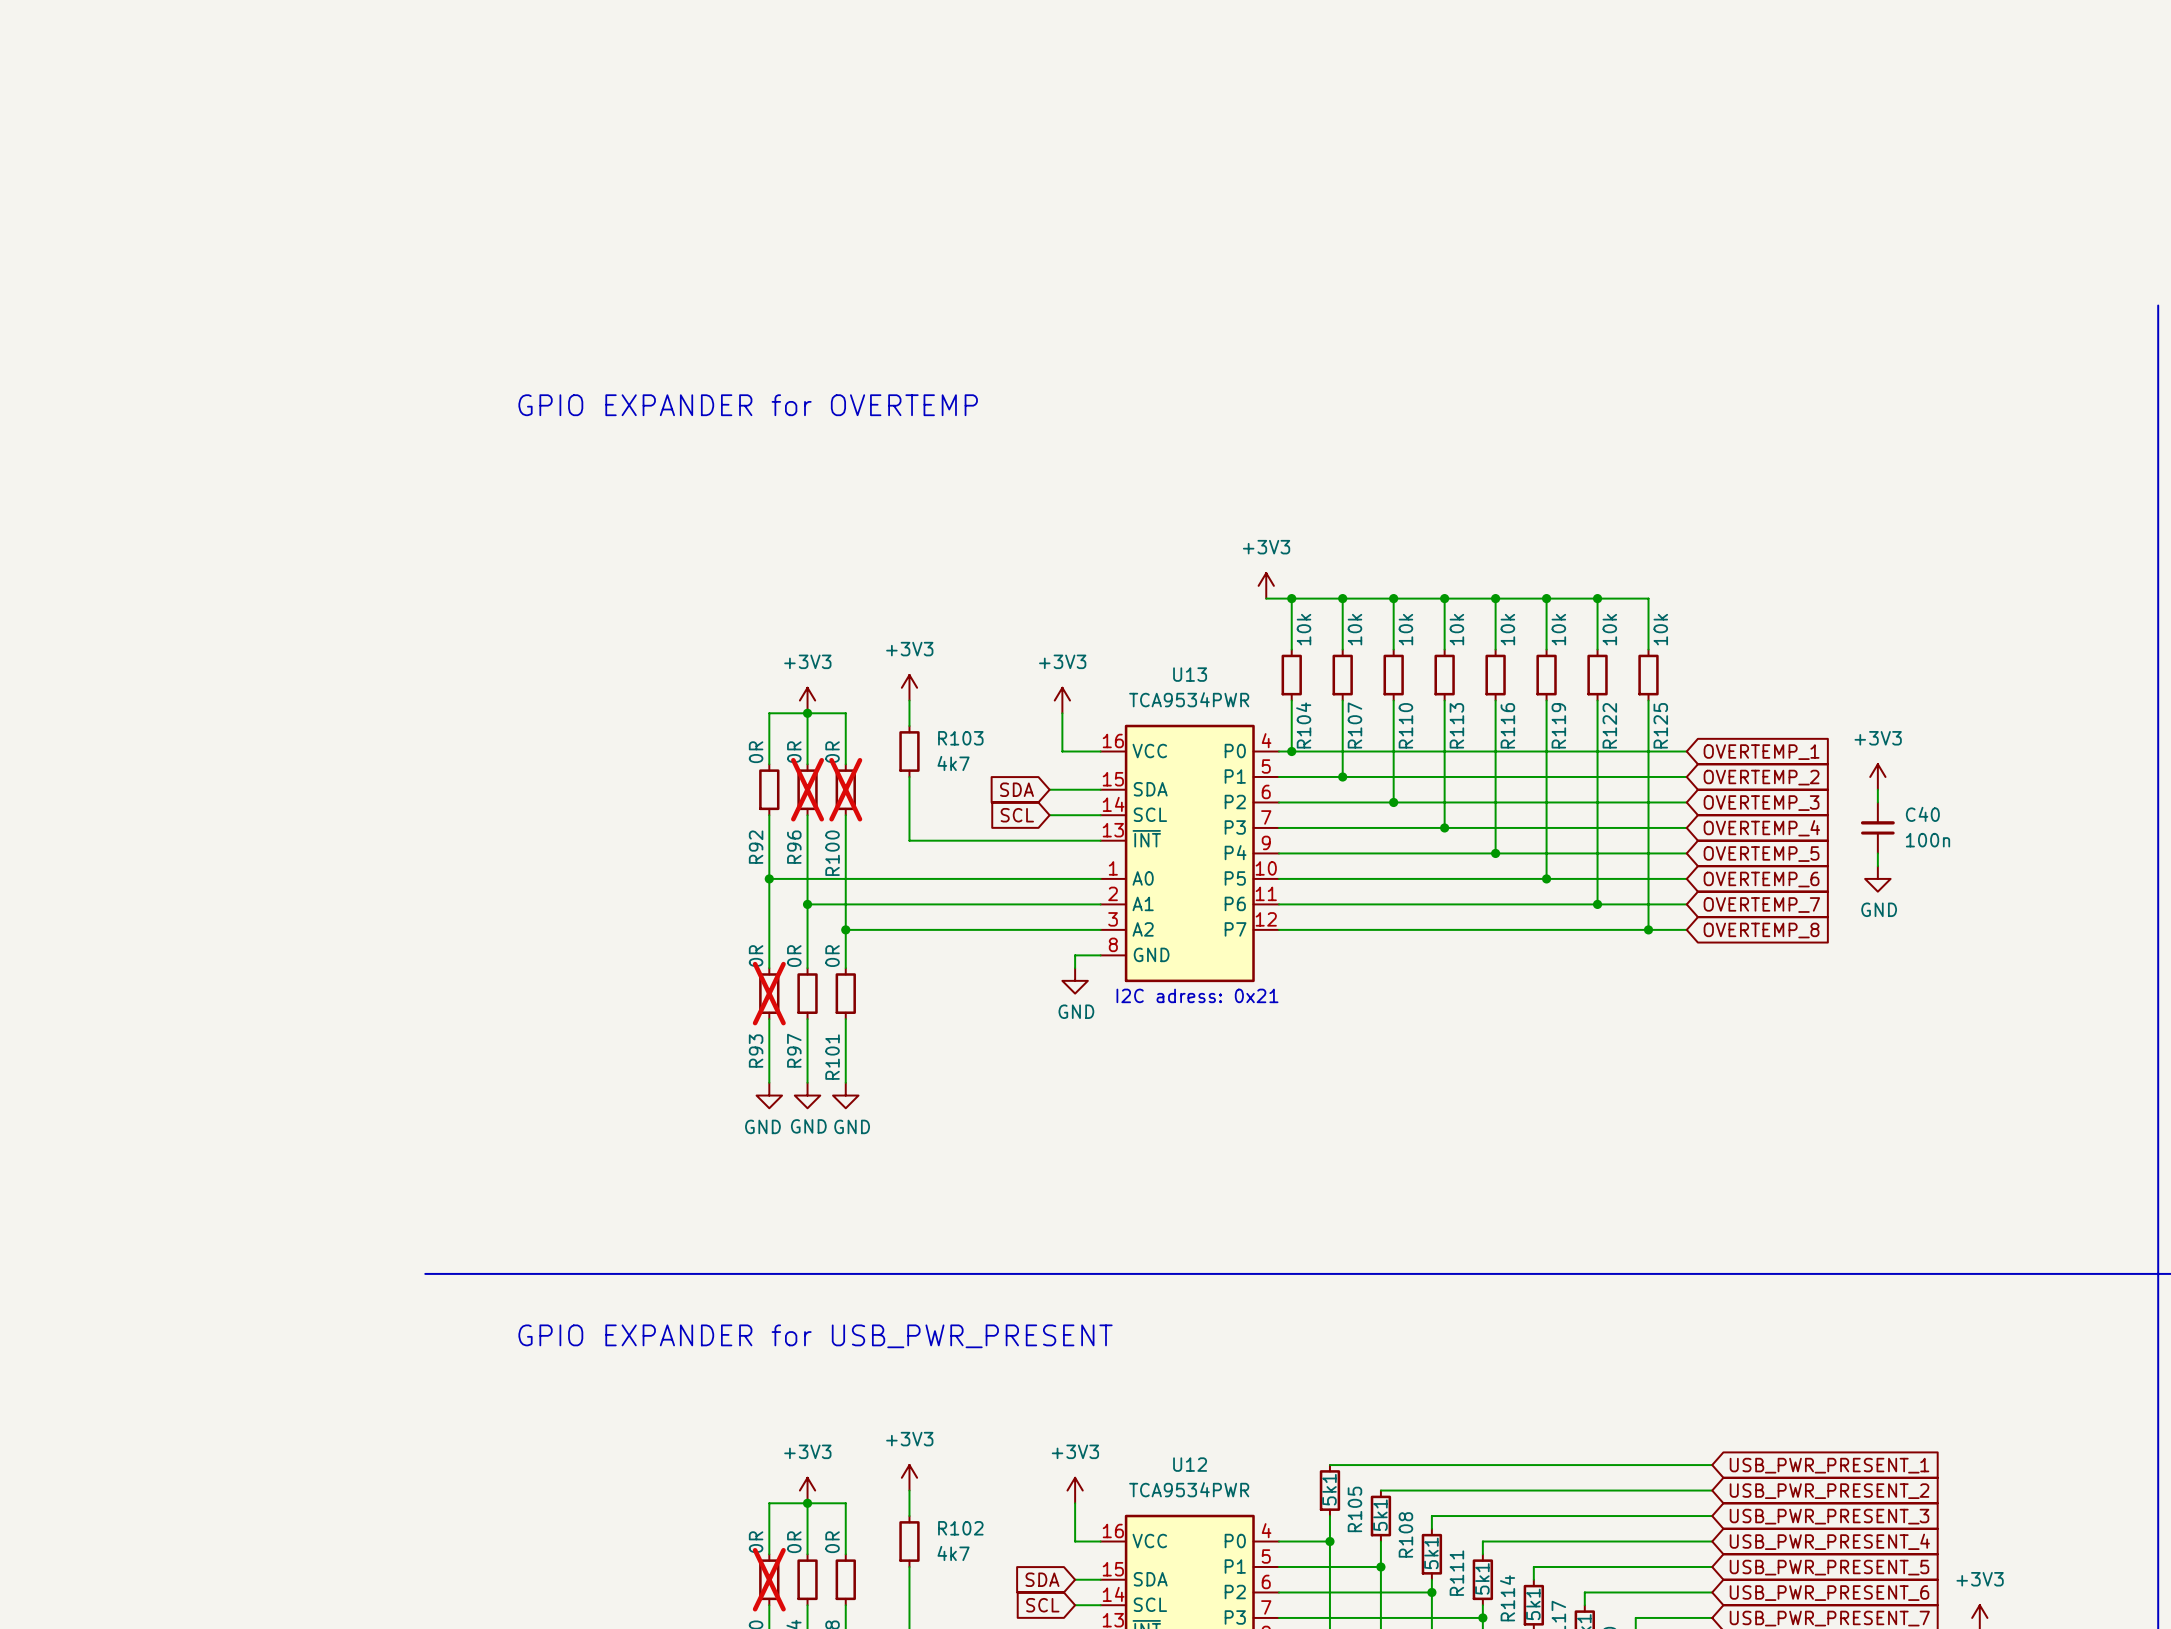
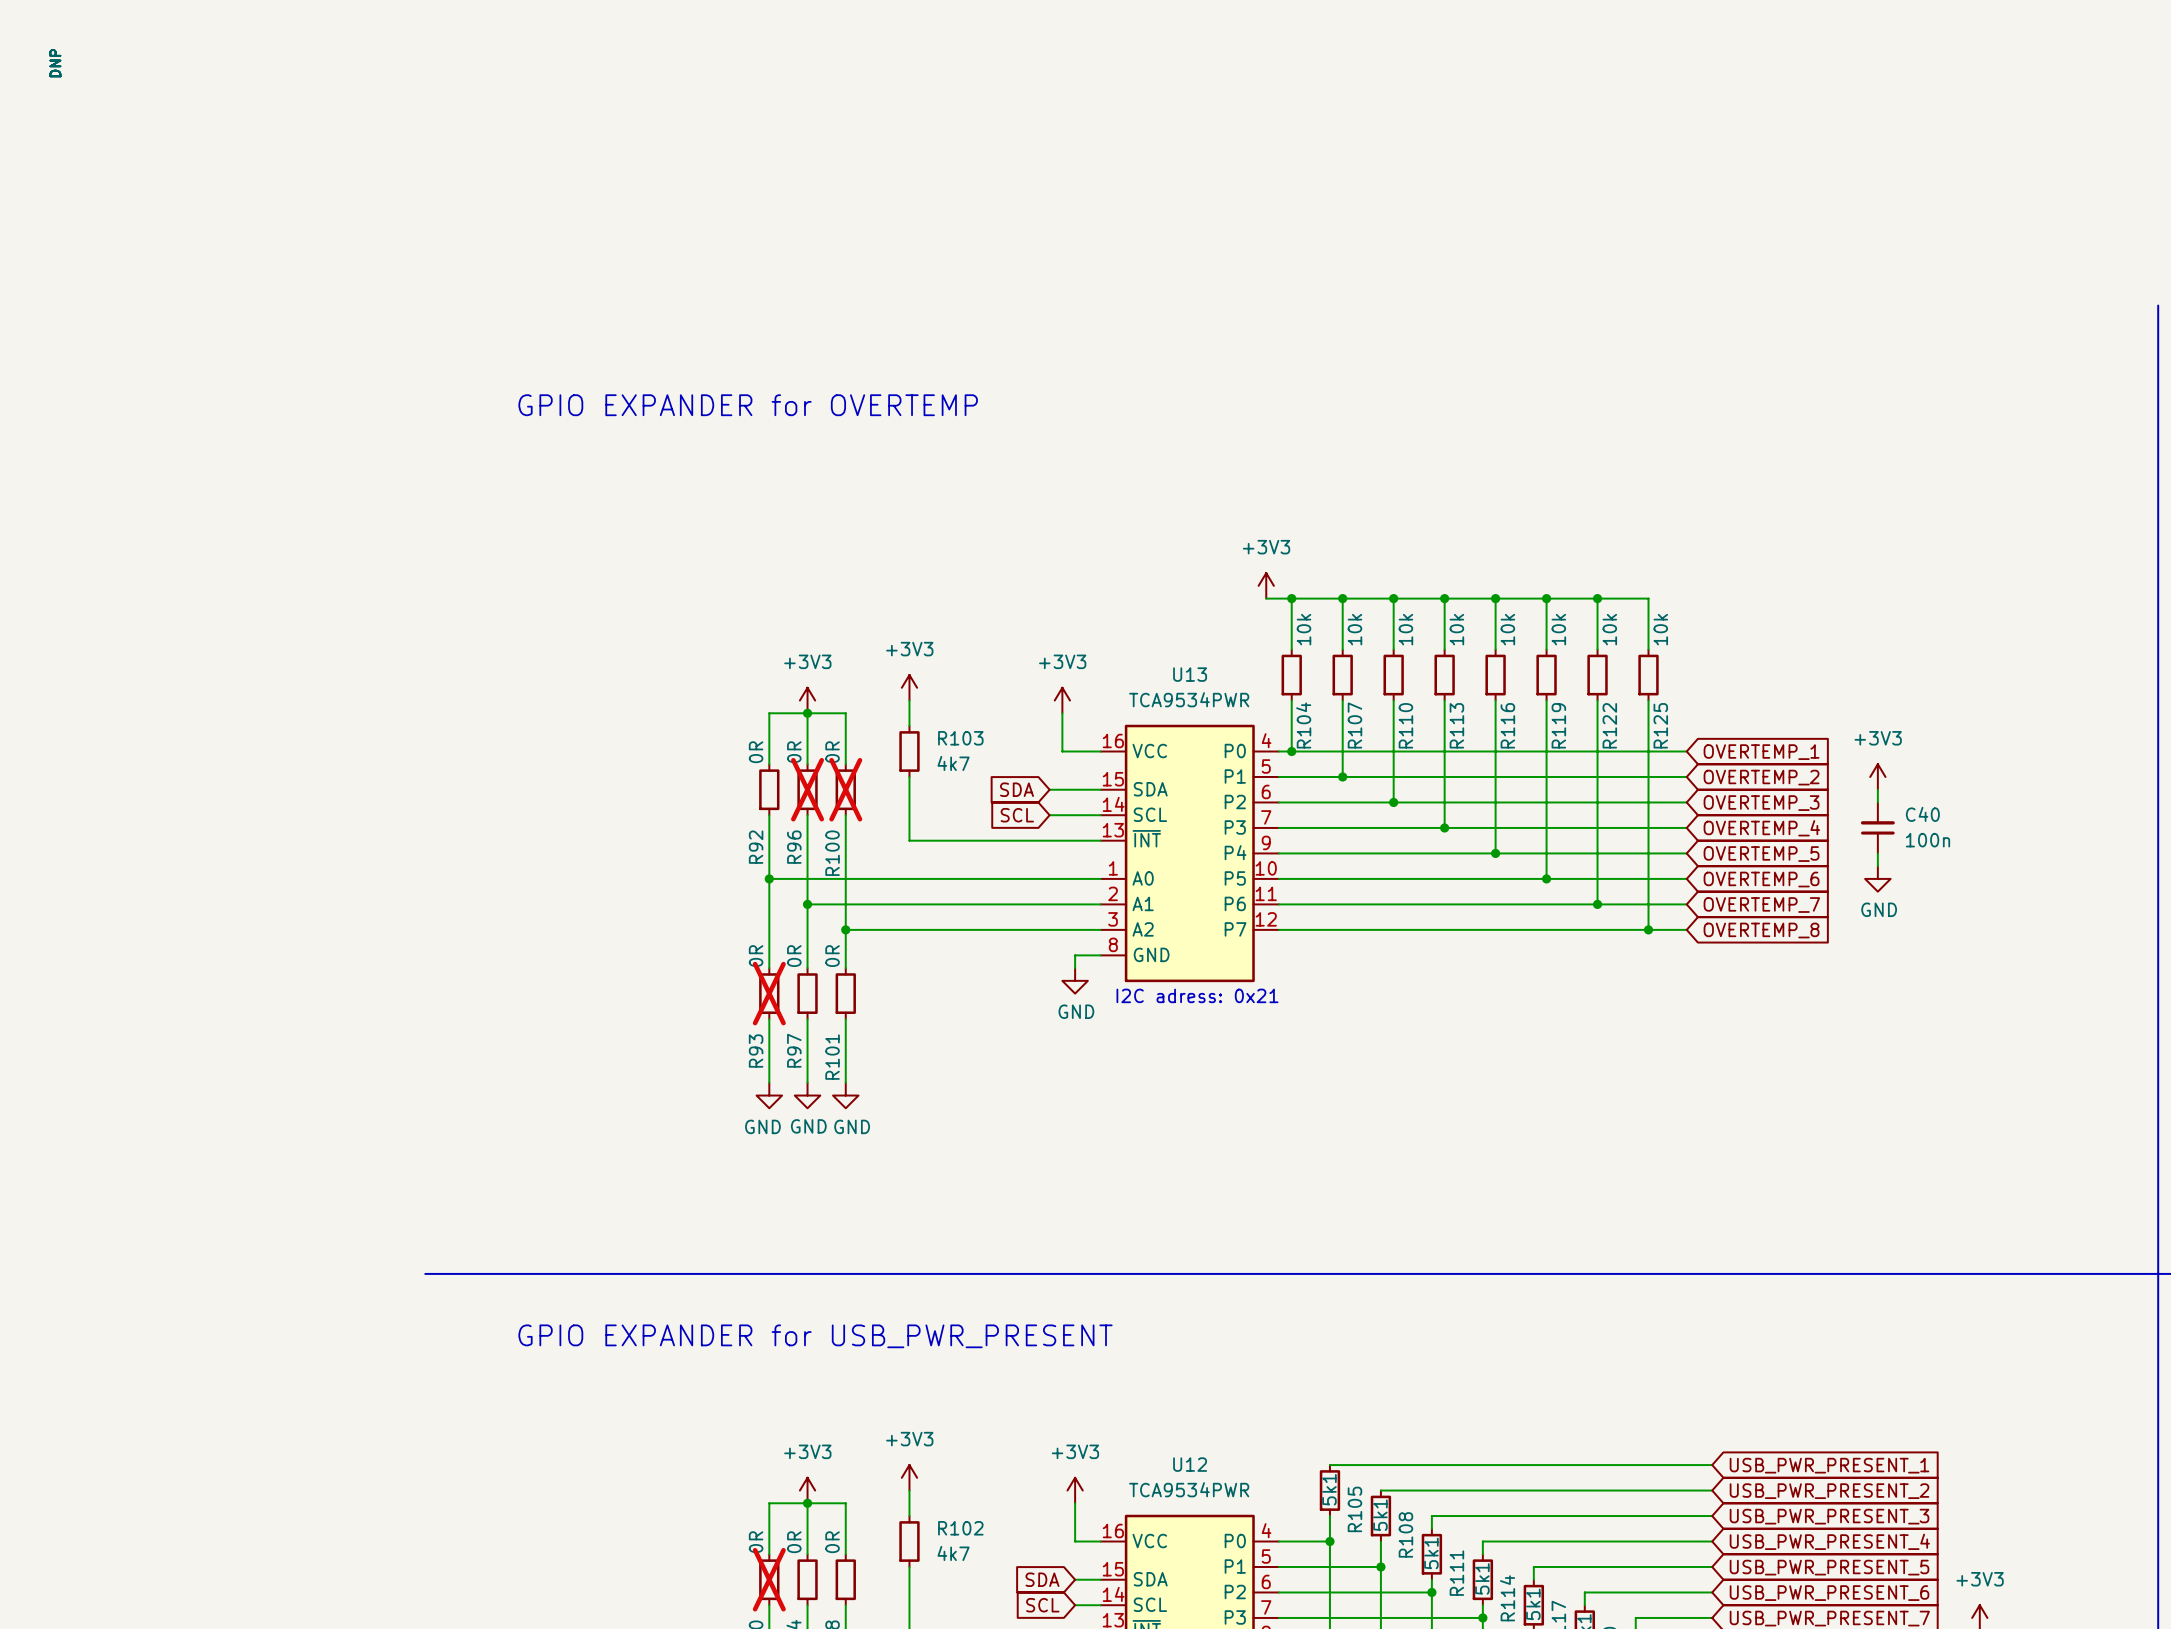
R96 text: none -> DNP (55, 63)
R100 text: none -> DNP (55, 63)
R93 text: none -> DNP (55, 63)

